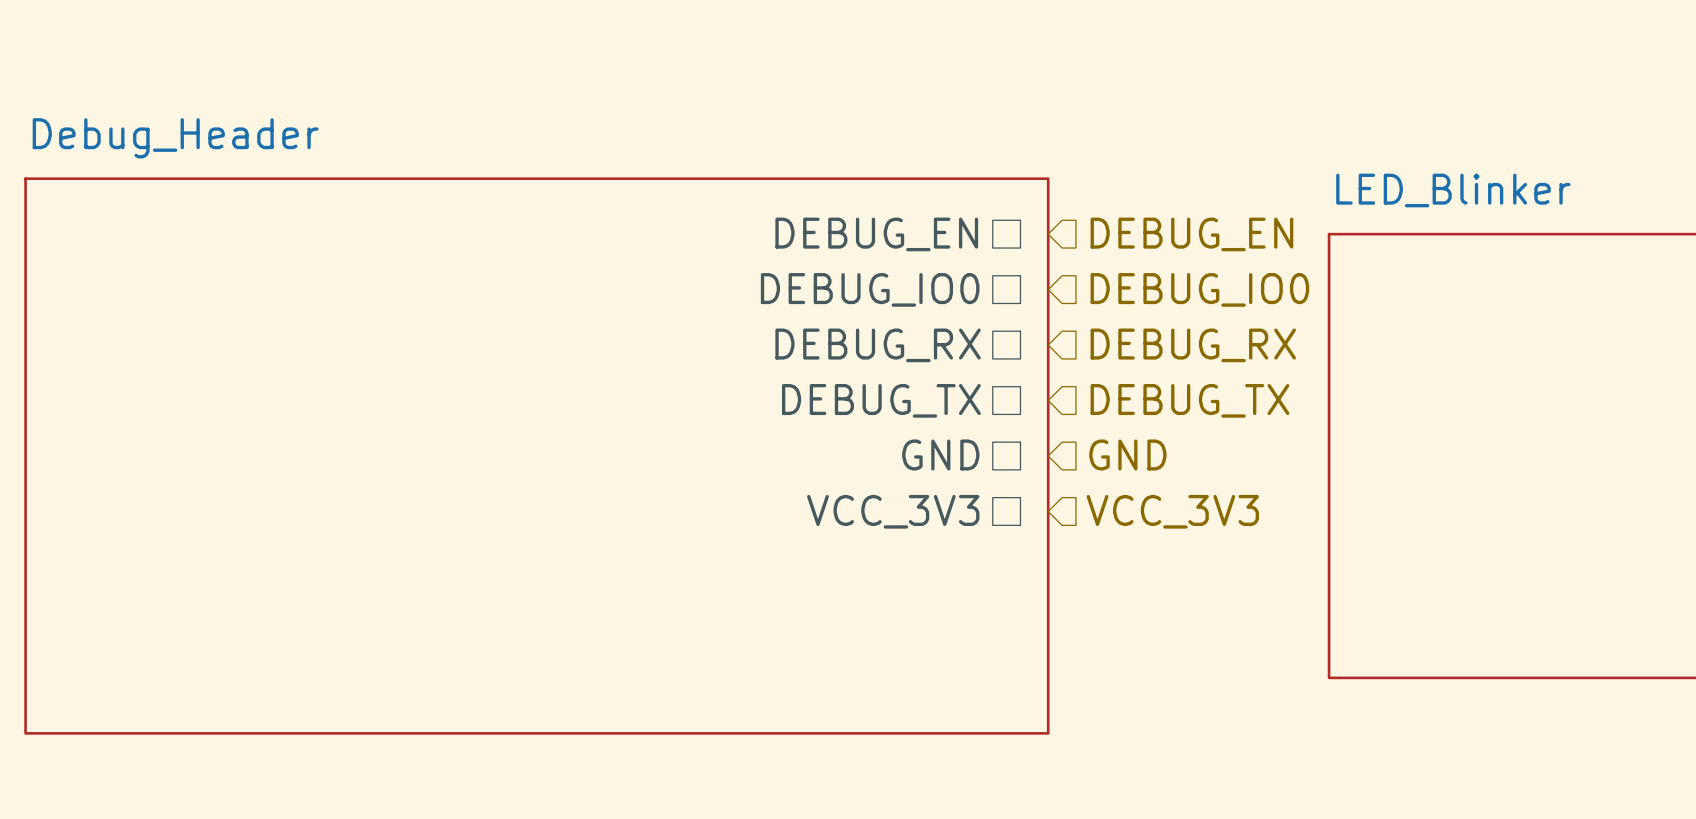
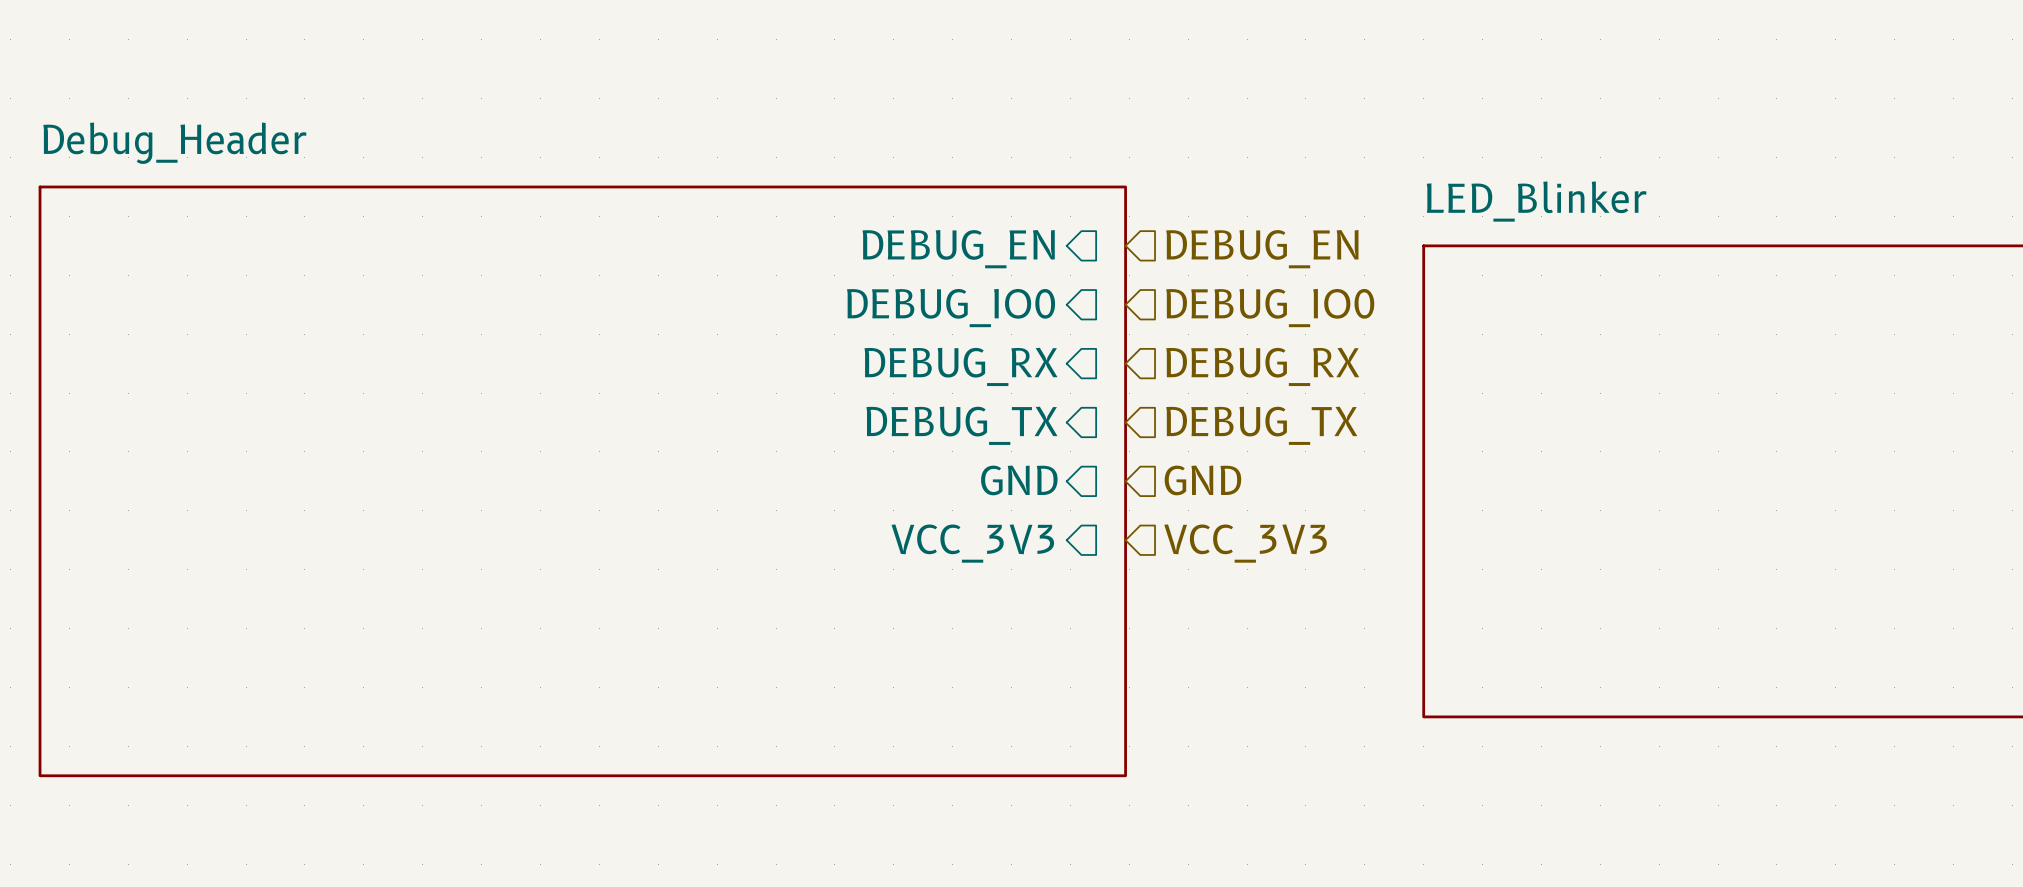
sheet pin shape: passive (876, 234) -> input (958, 249)
sheet pin shape: passive (870, 289) -> input (951, 308)
sheet pin shape: passive (878, 345) -> input (960, 366)
sheet pin shape: passive (881, 400) -> input (961, 425)
sheet pin shape: passive (940, 454) -> input (1019, 480)
sheet pin shape: passive (893, 511) -> input (972, 543)

